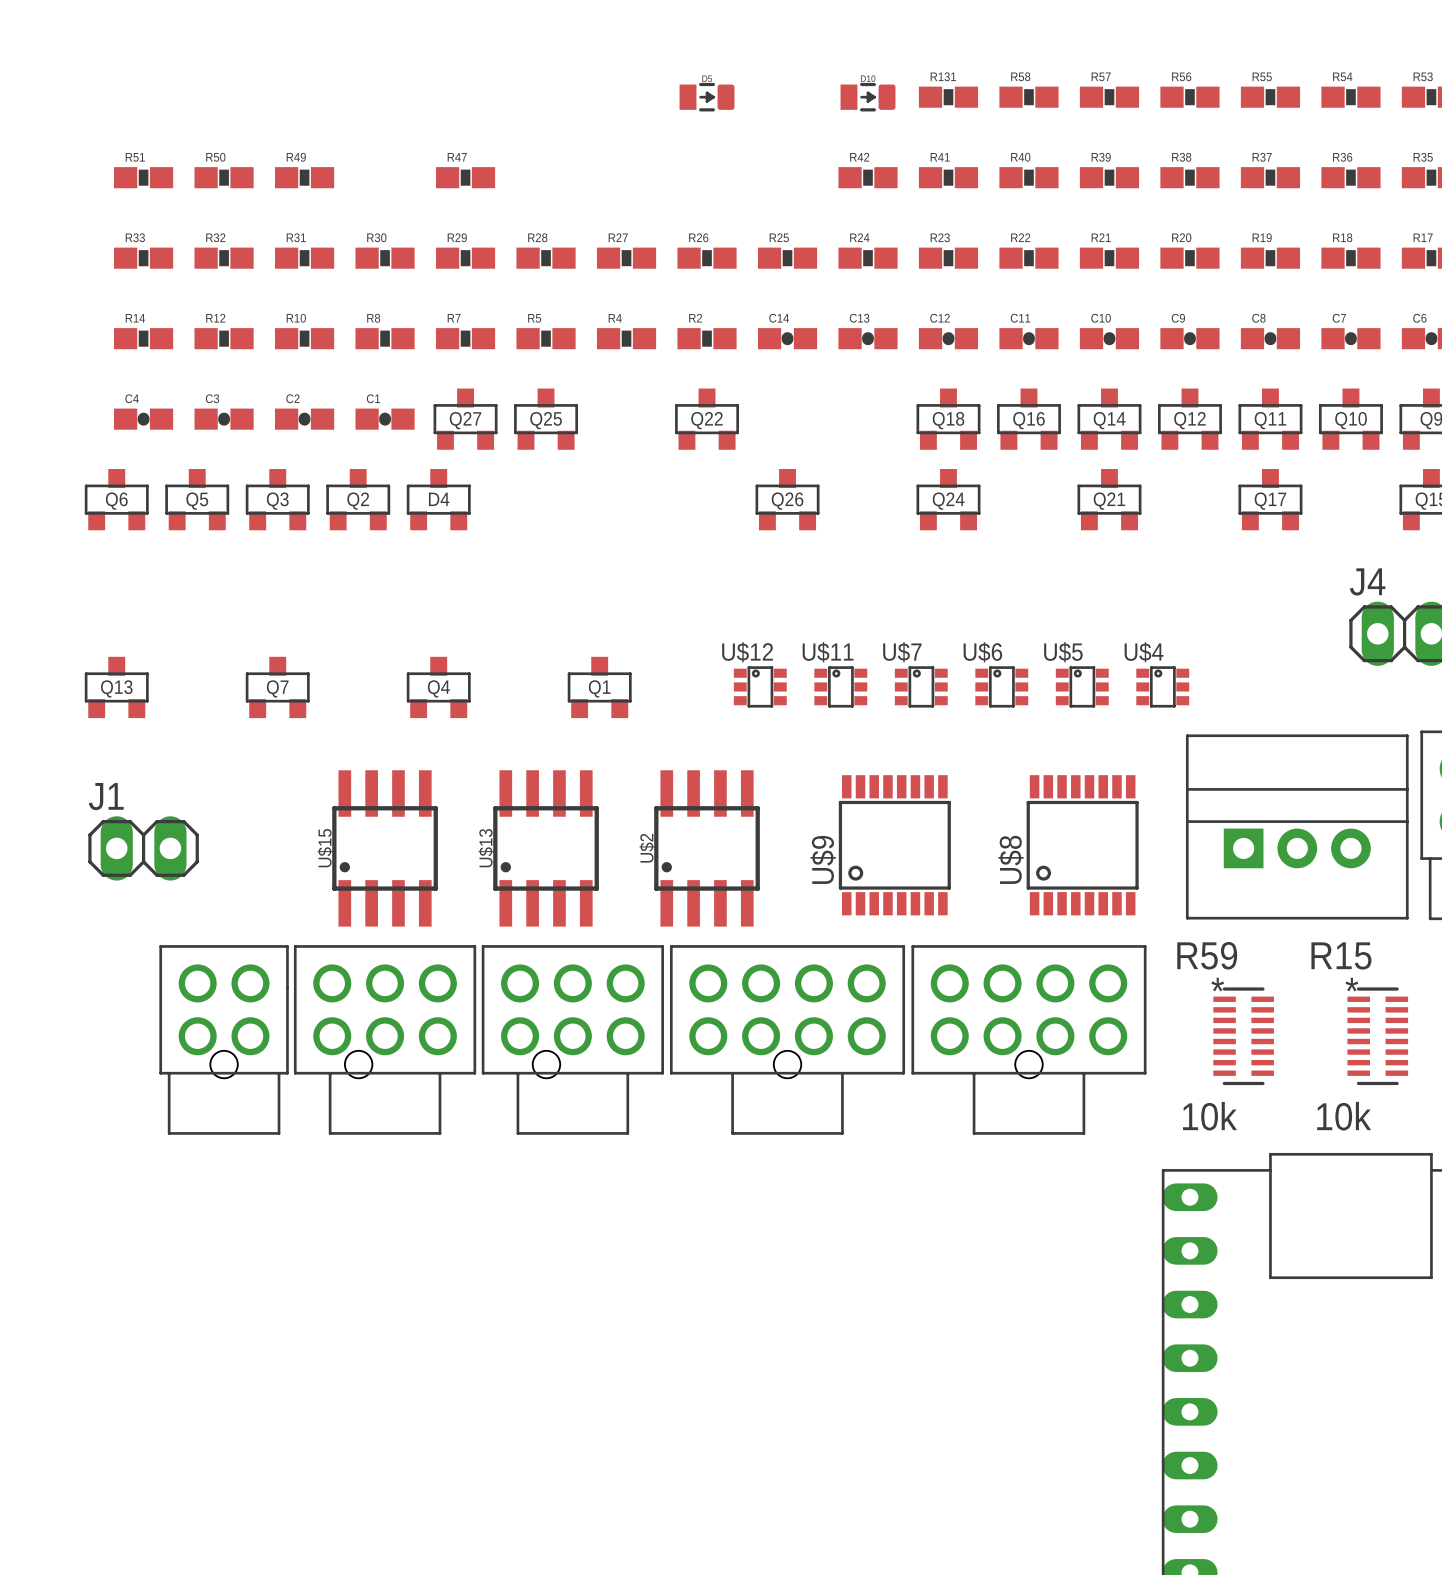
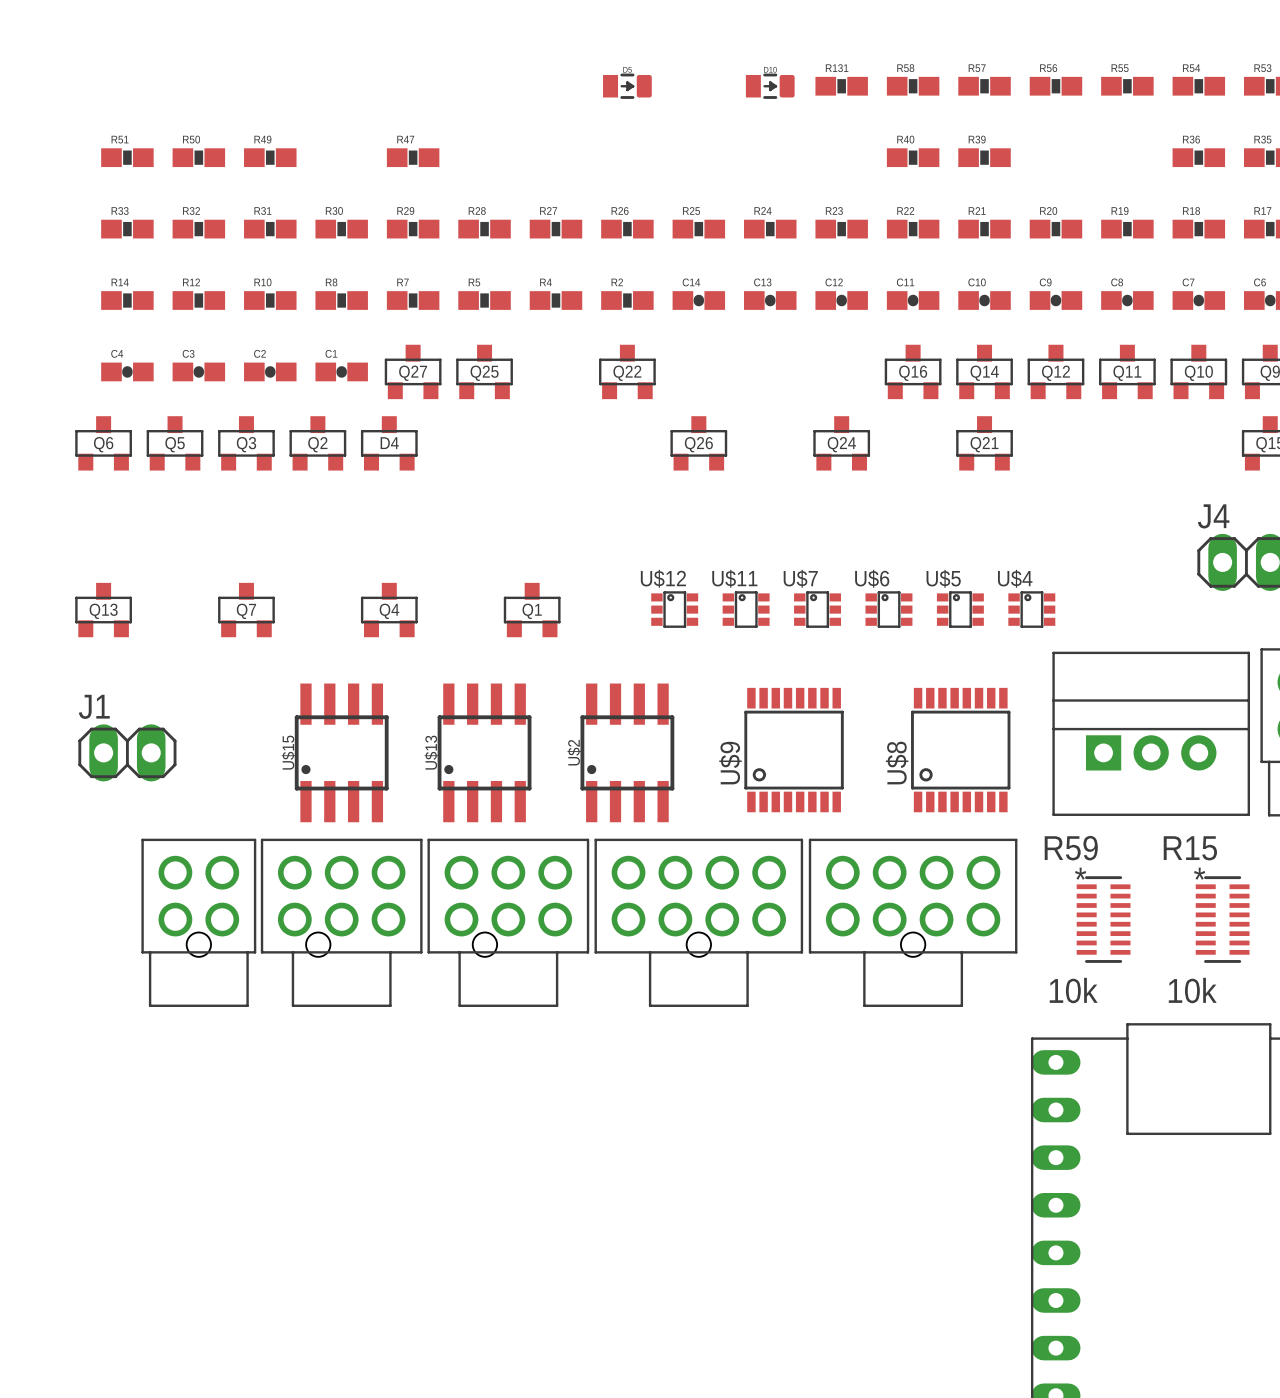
R42: (868, 177) -> none
R41: (948, 177) -> none
R38: (1189, 177) -> none
R37: (1270, 177) -> none
Q18: (948, 419) -> none
Q17: (1270, 499) -> none

